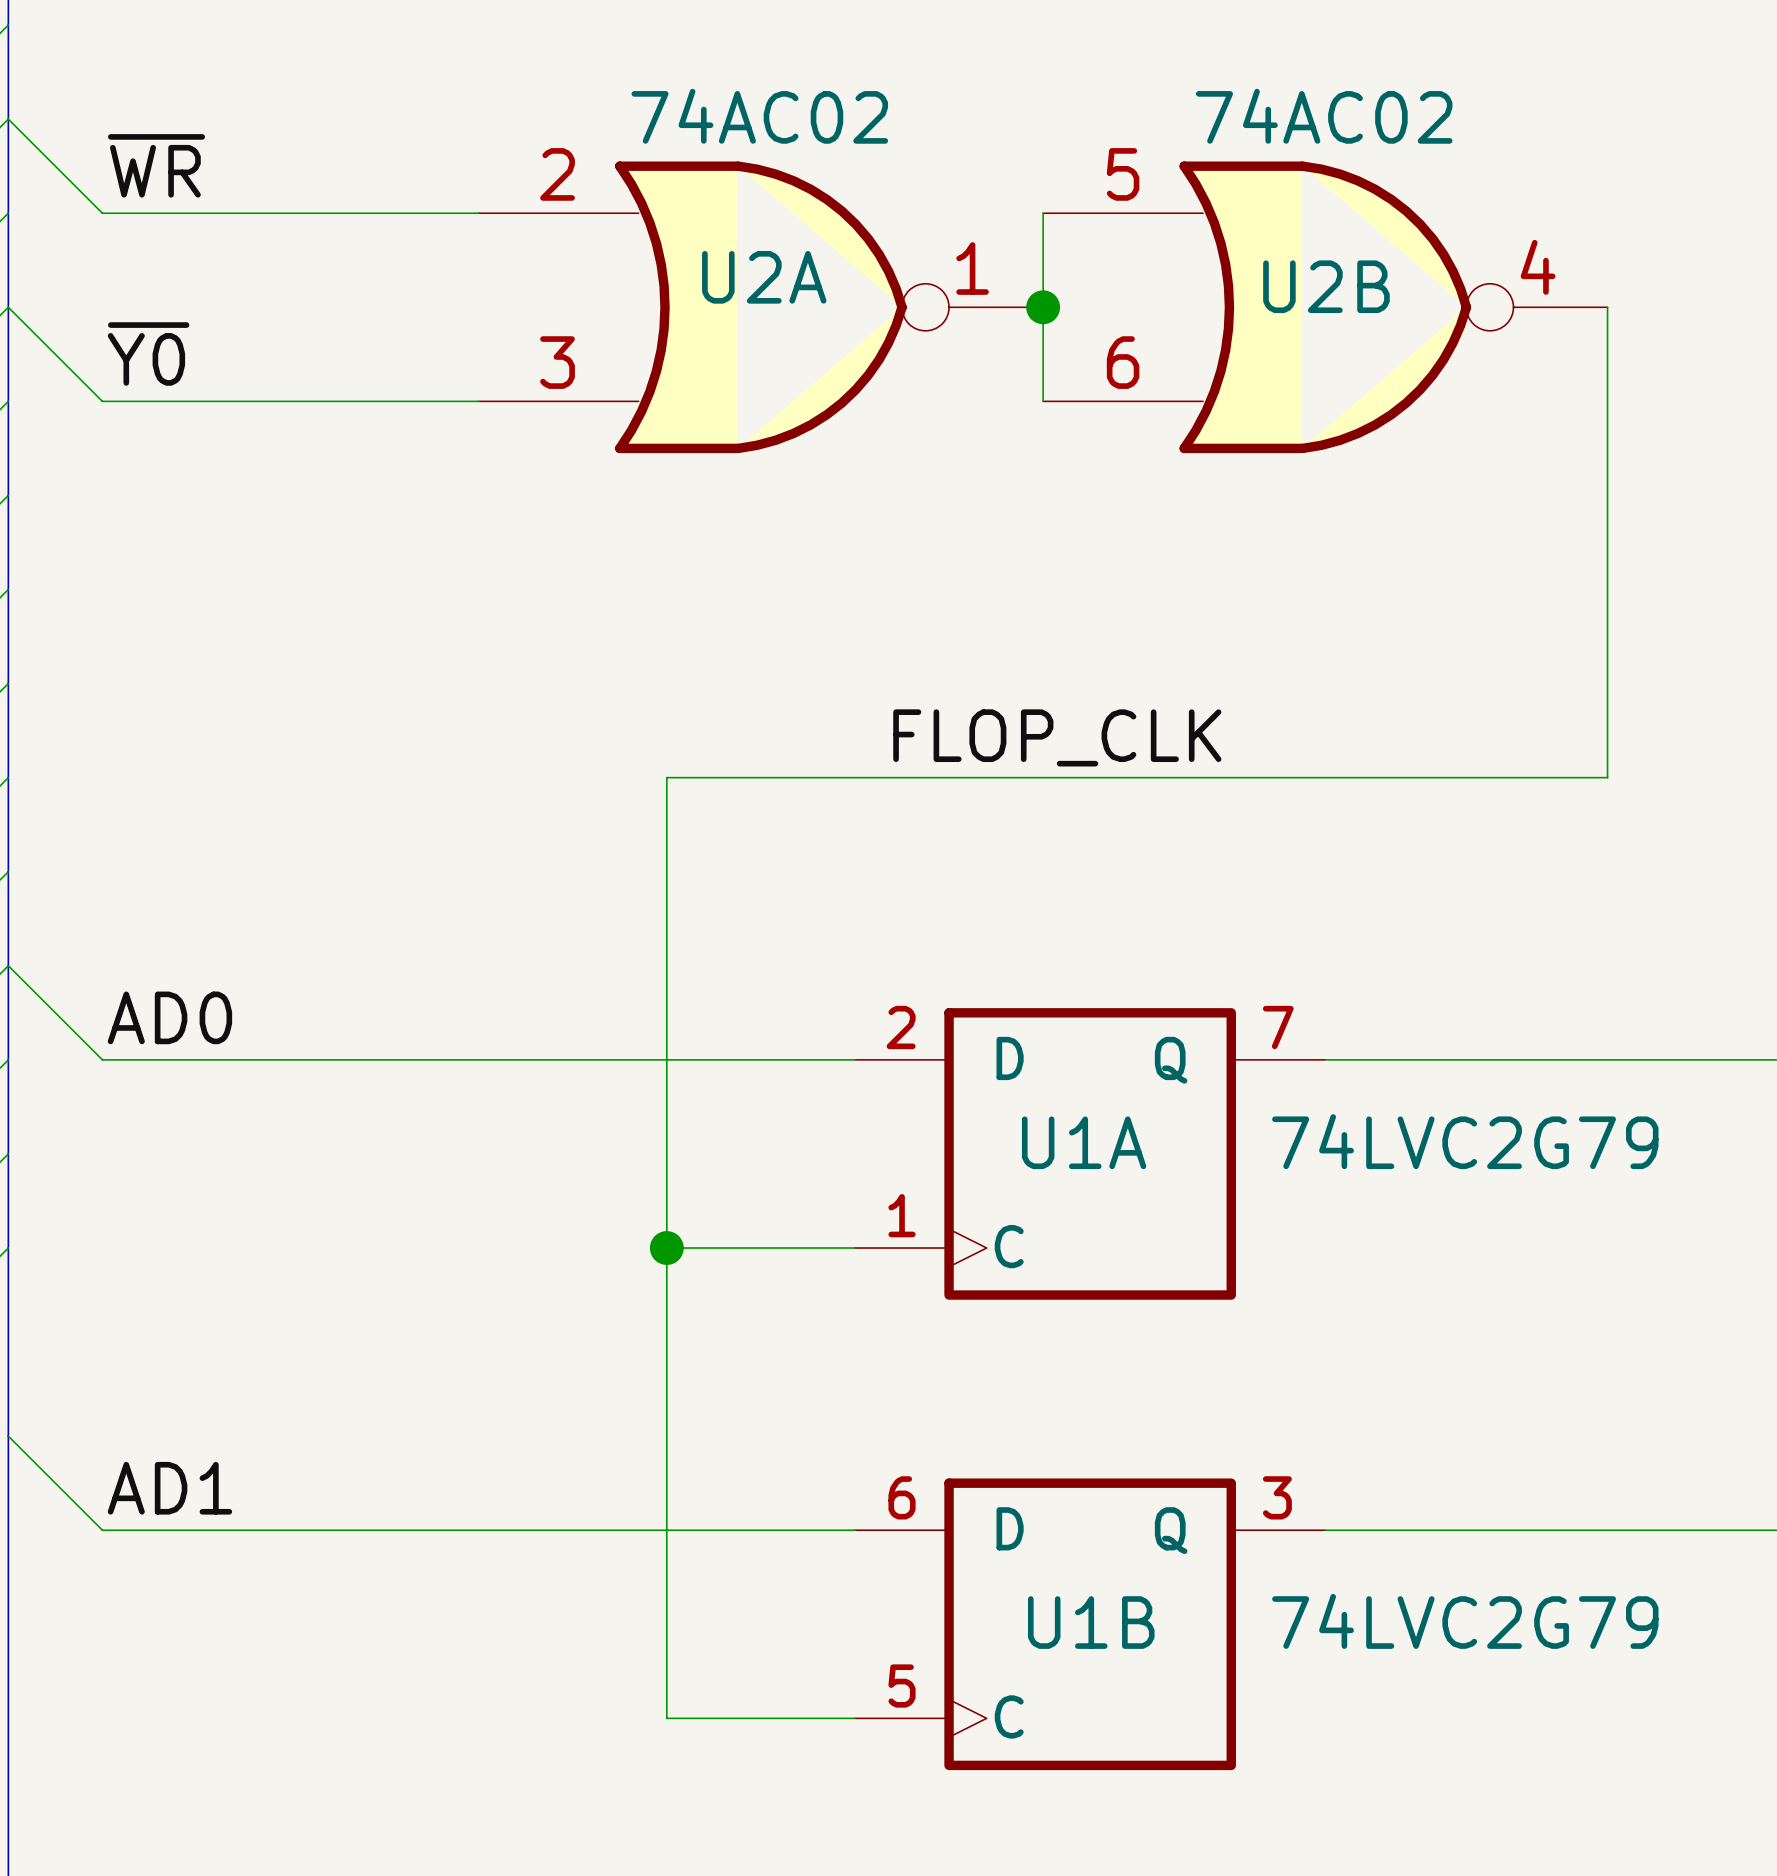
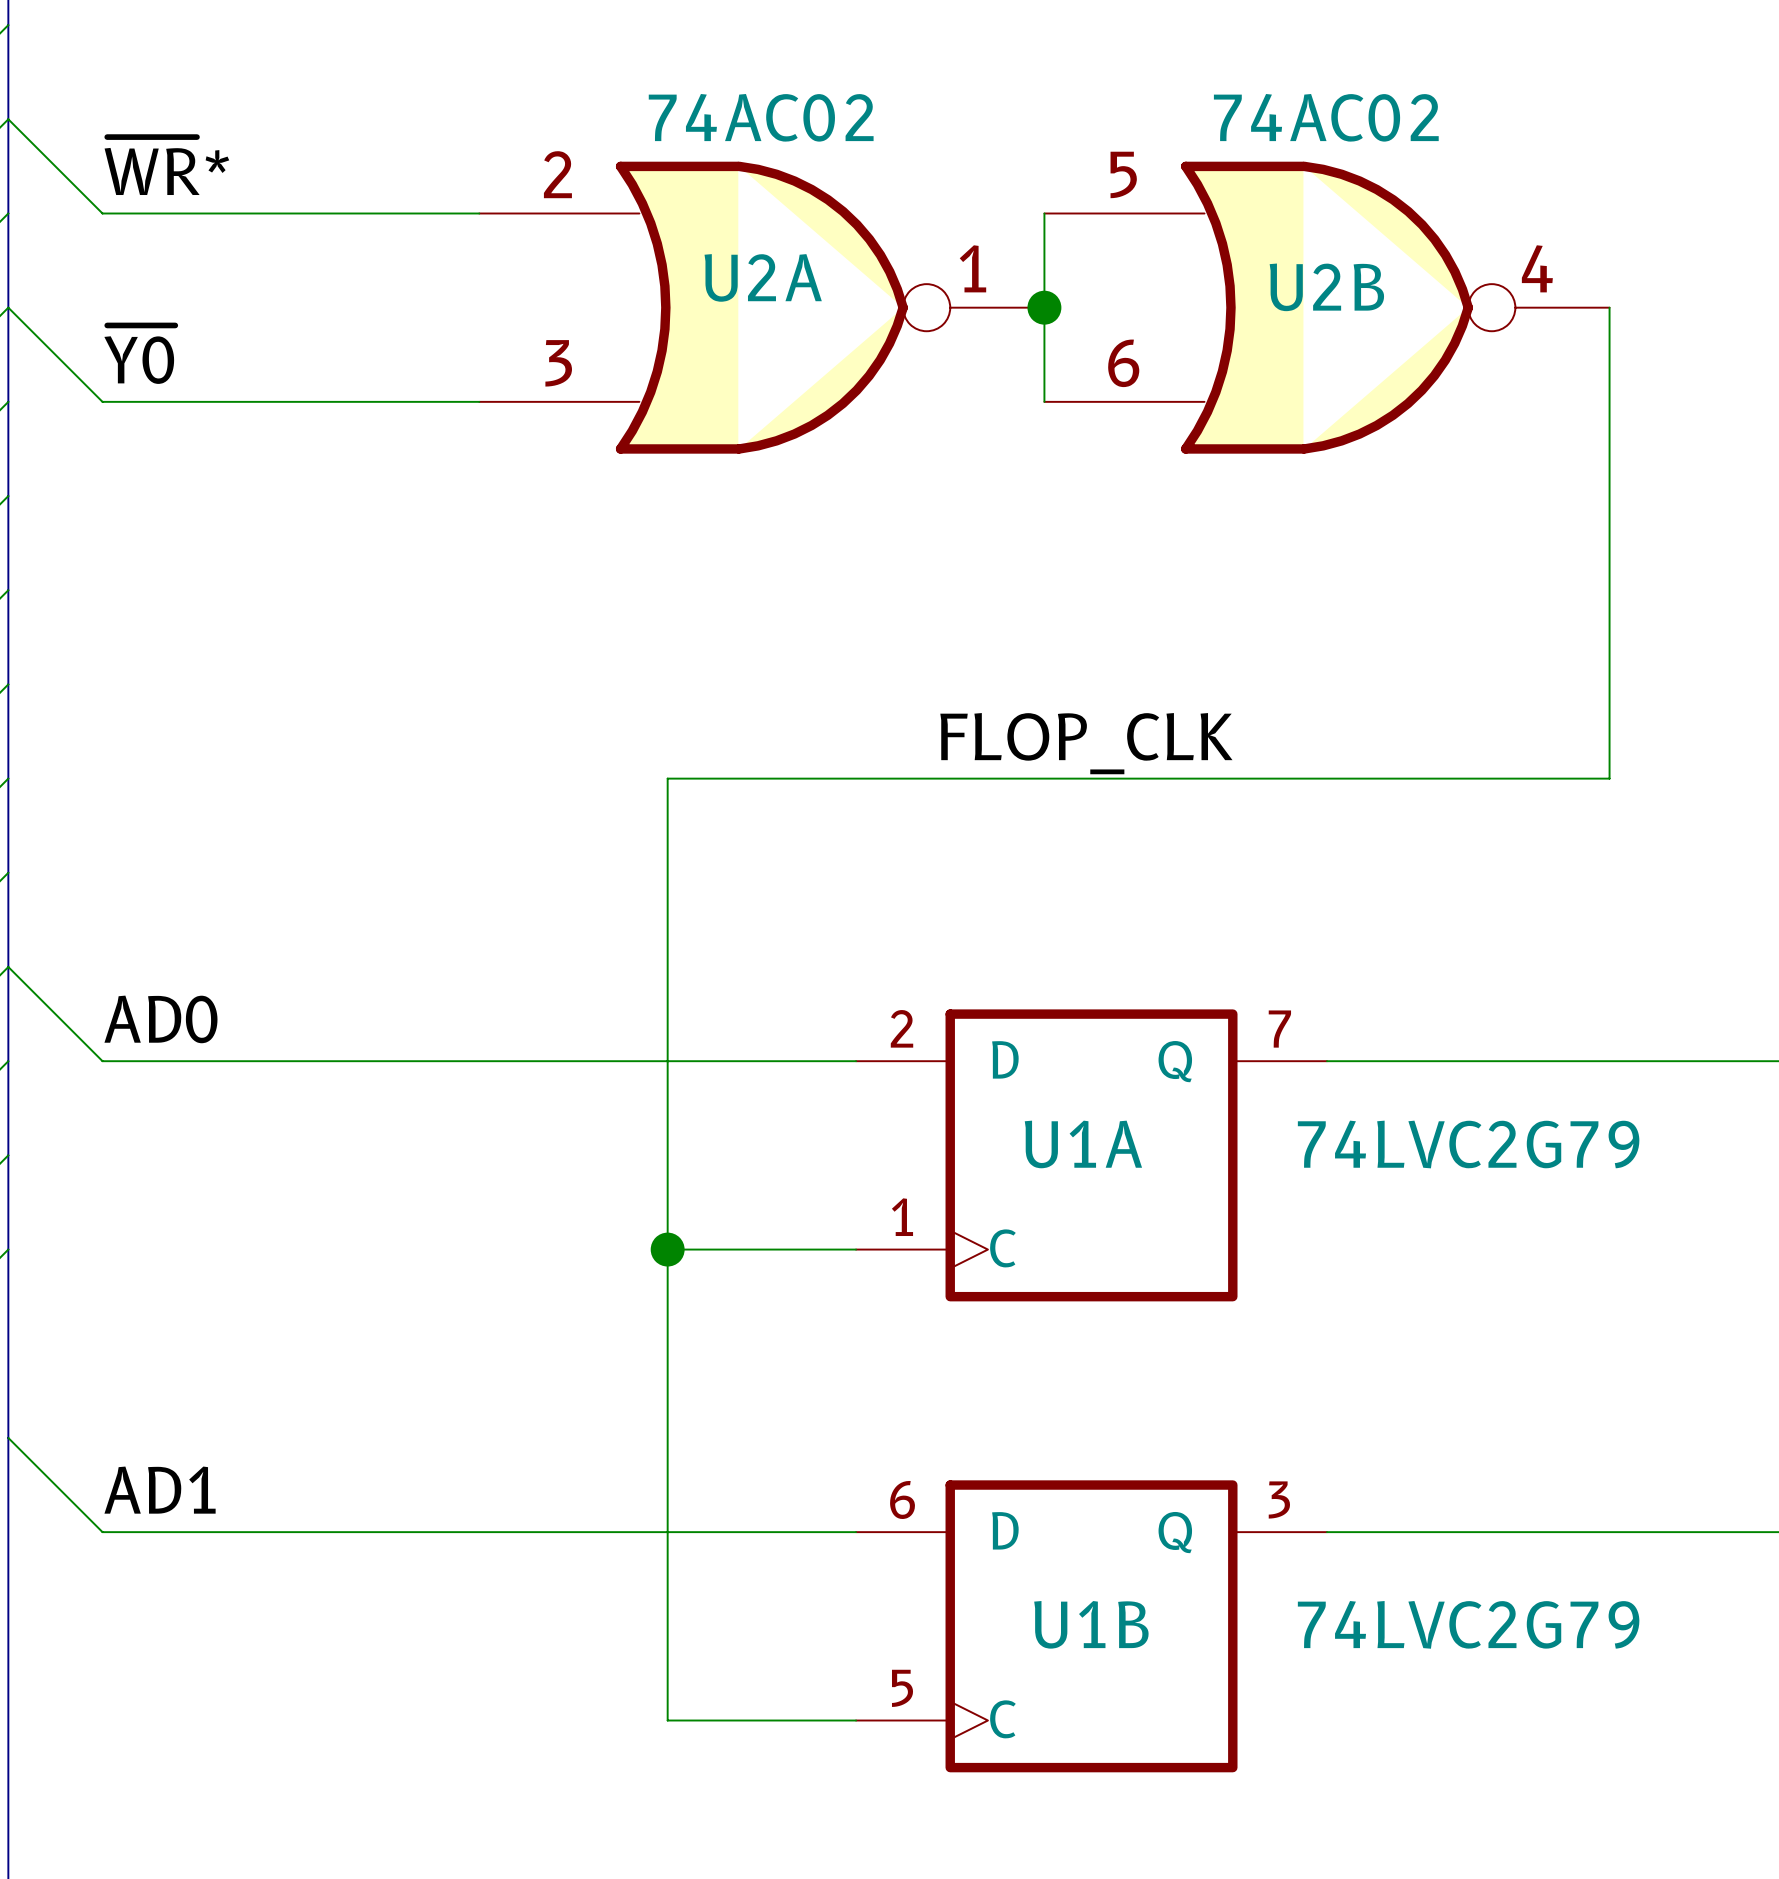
label: ~{WR} (156, 165) -> ~{WR}* (166, 166)

